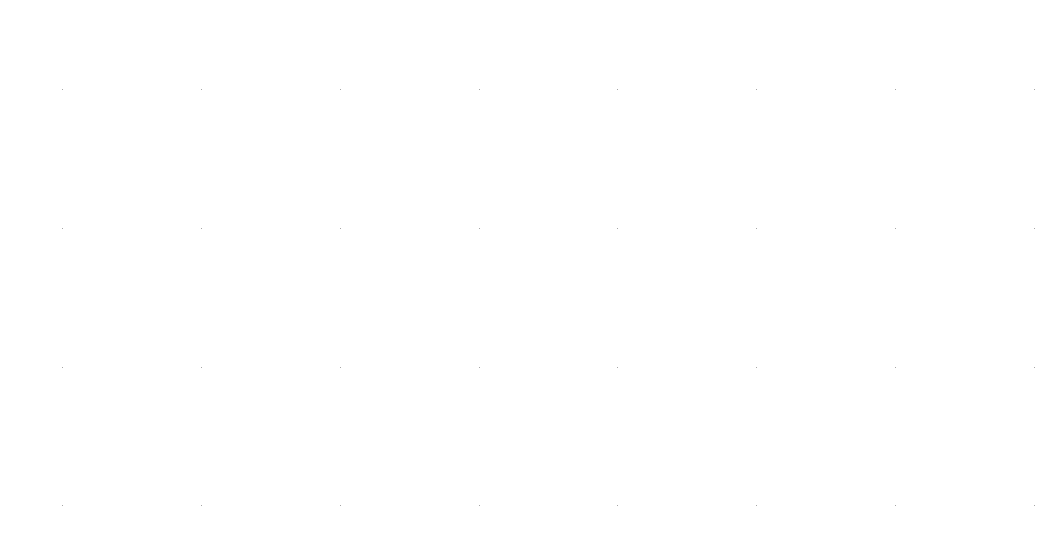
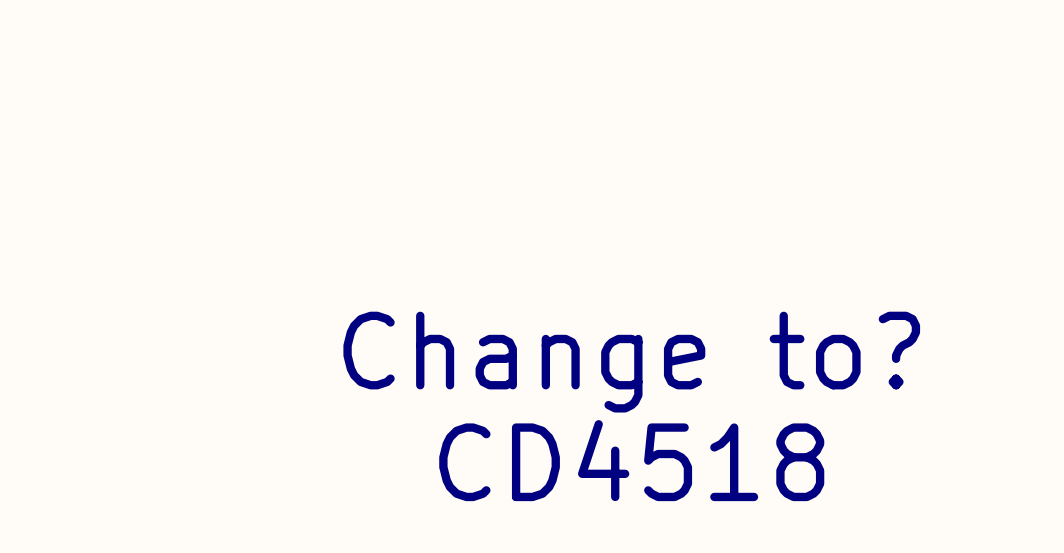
text: none -> Change to? (631, 362)
text: none -> CD4518 (631, 460)

